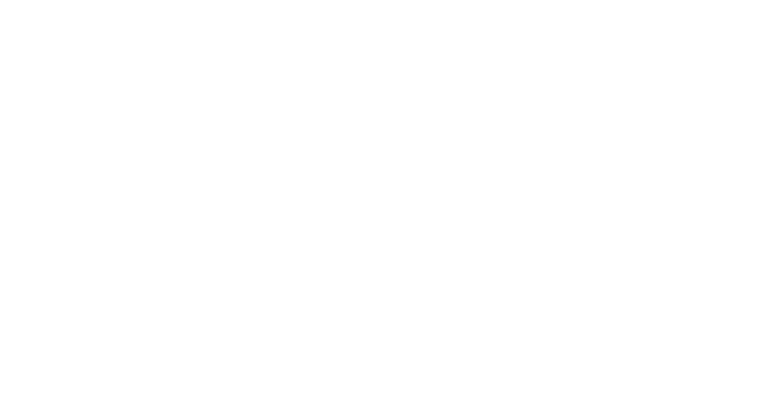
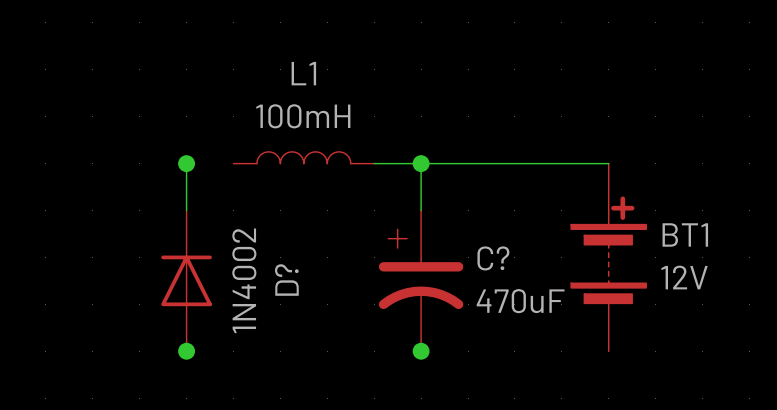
L1: none -> 100mH (303, 157)
wire: none -> (186, 163) (186, 210)
junction: none -> (186, 163)
wire: none -> (374, 163) (608, 163)
wire: none -> (421, 163) (421, 210)
junction: none -> (421, 163)
BT1: none -> 12V (608, 257)
D?: none -> 1N4002 (186, 280)
C?: none -> 470uF (421, 280)
junction: none -> (186, 351)
junction: none -> (421, 351)

